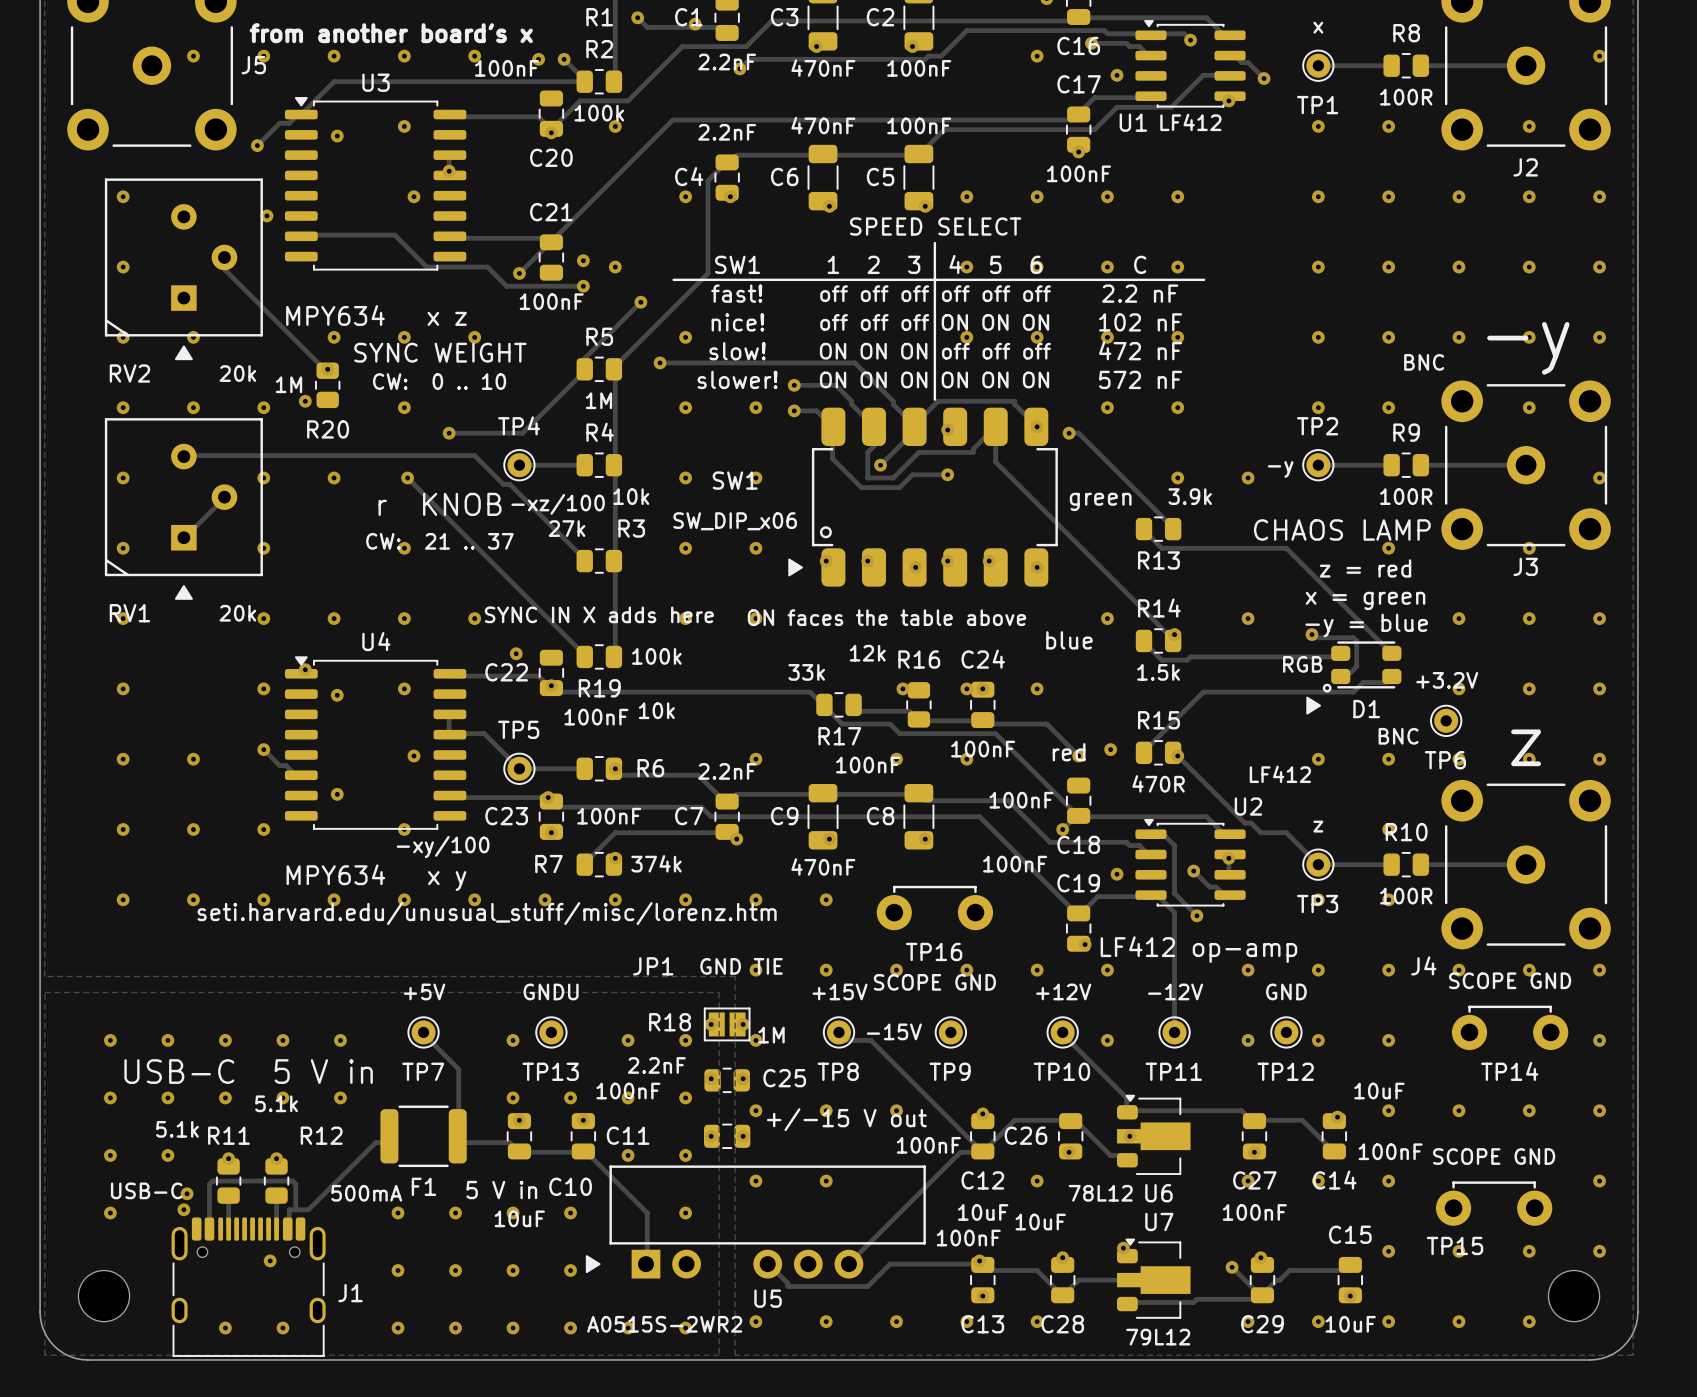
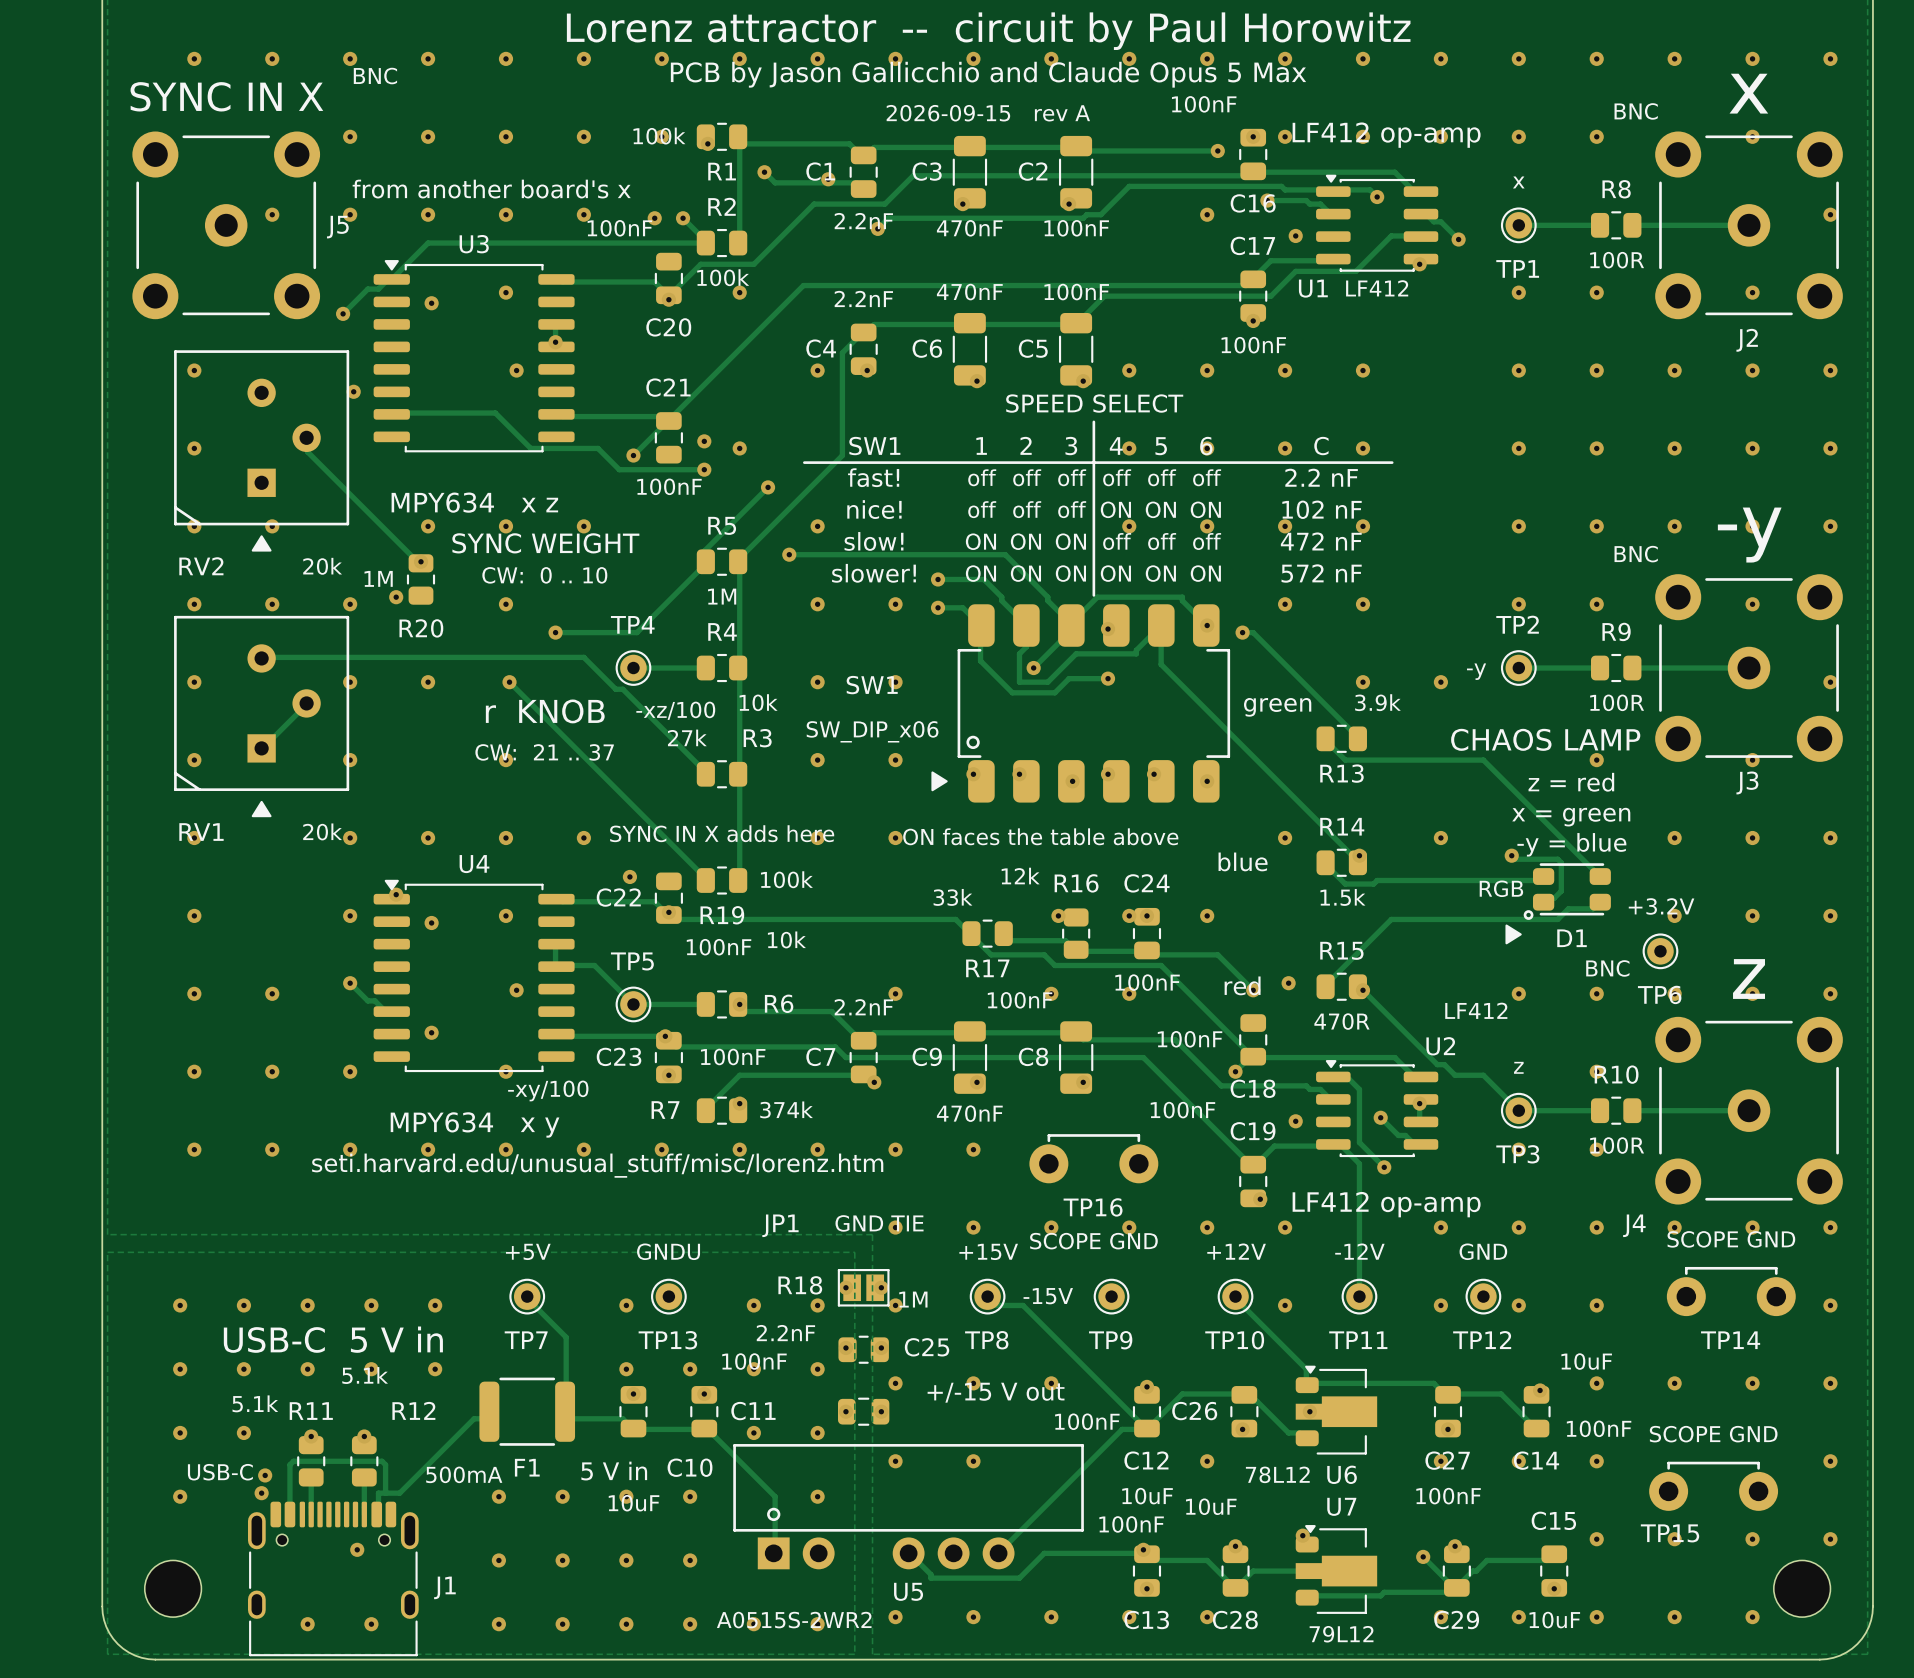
U5 footprint: [609, 1165, 926, 1279] -> [733, 1444, 1084, 1570]
drawing: [585, 1255, 601, 1274] -> none

